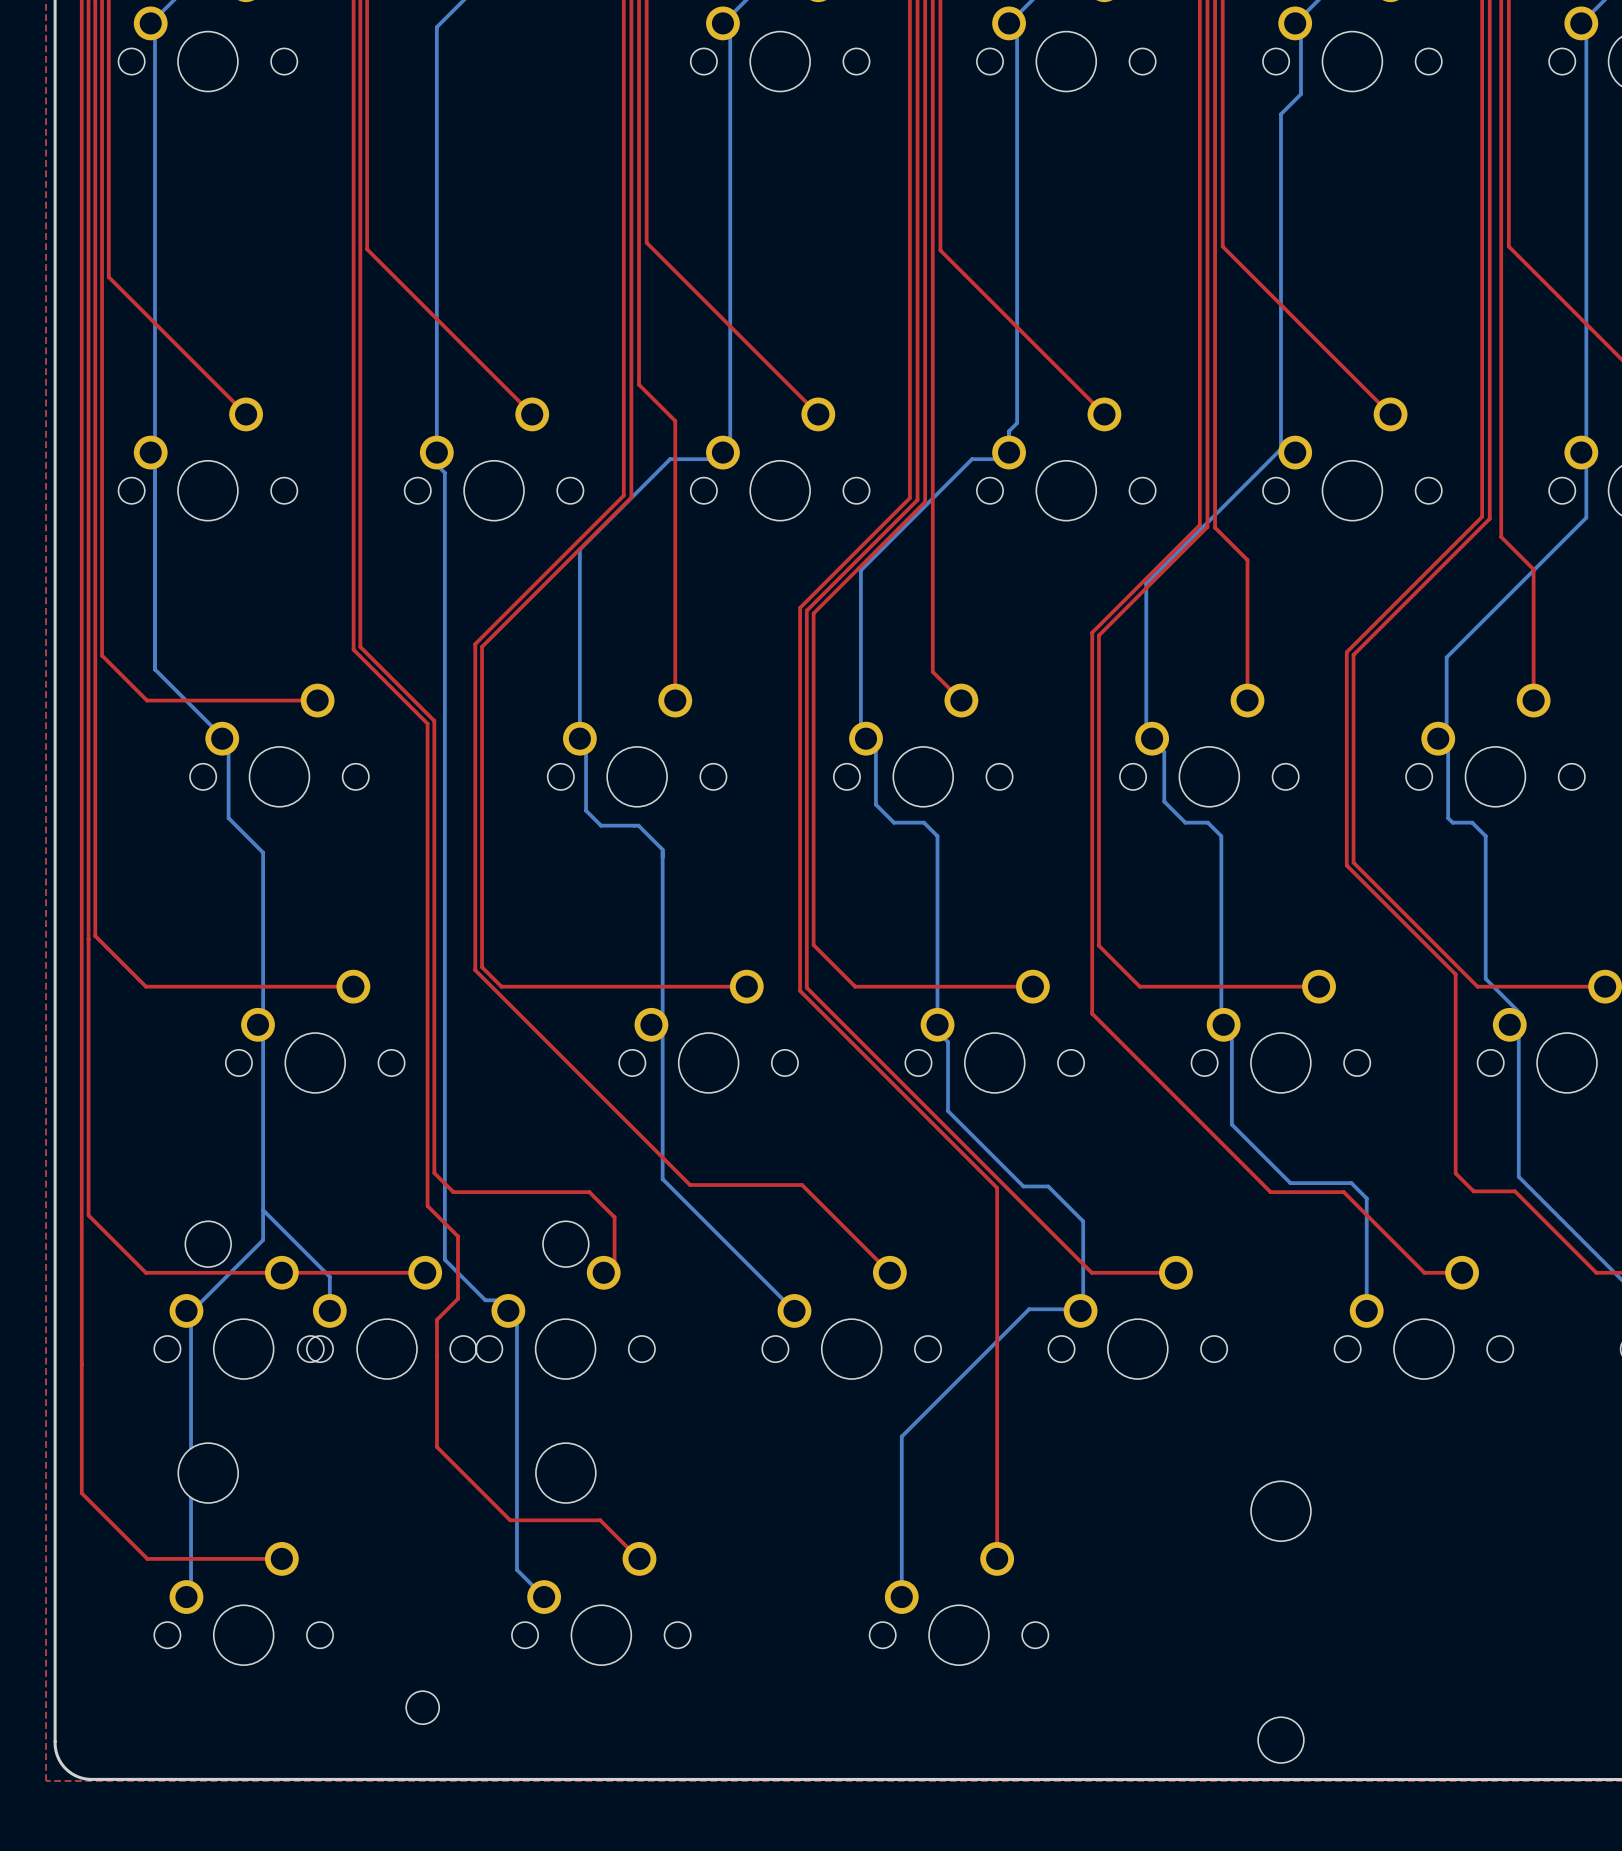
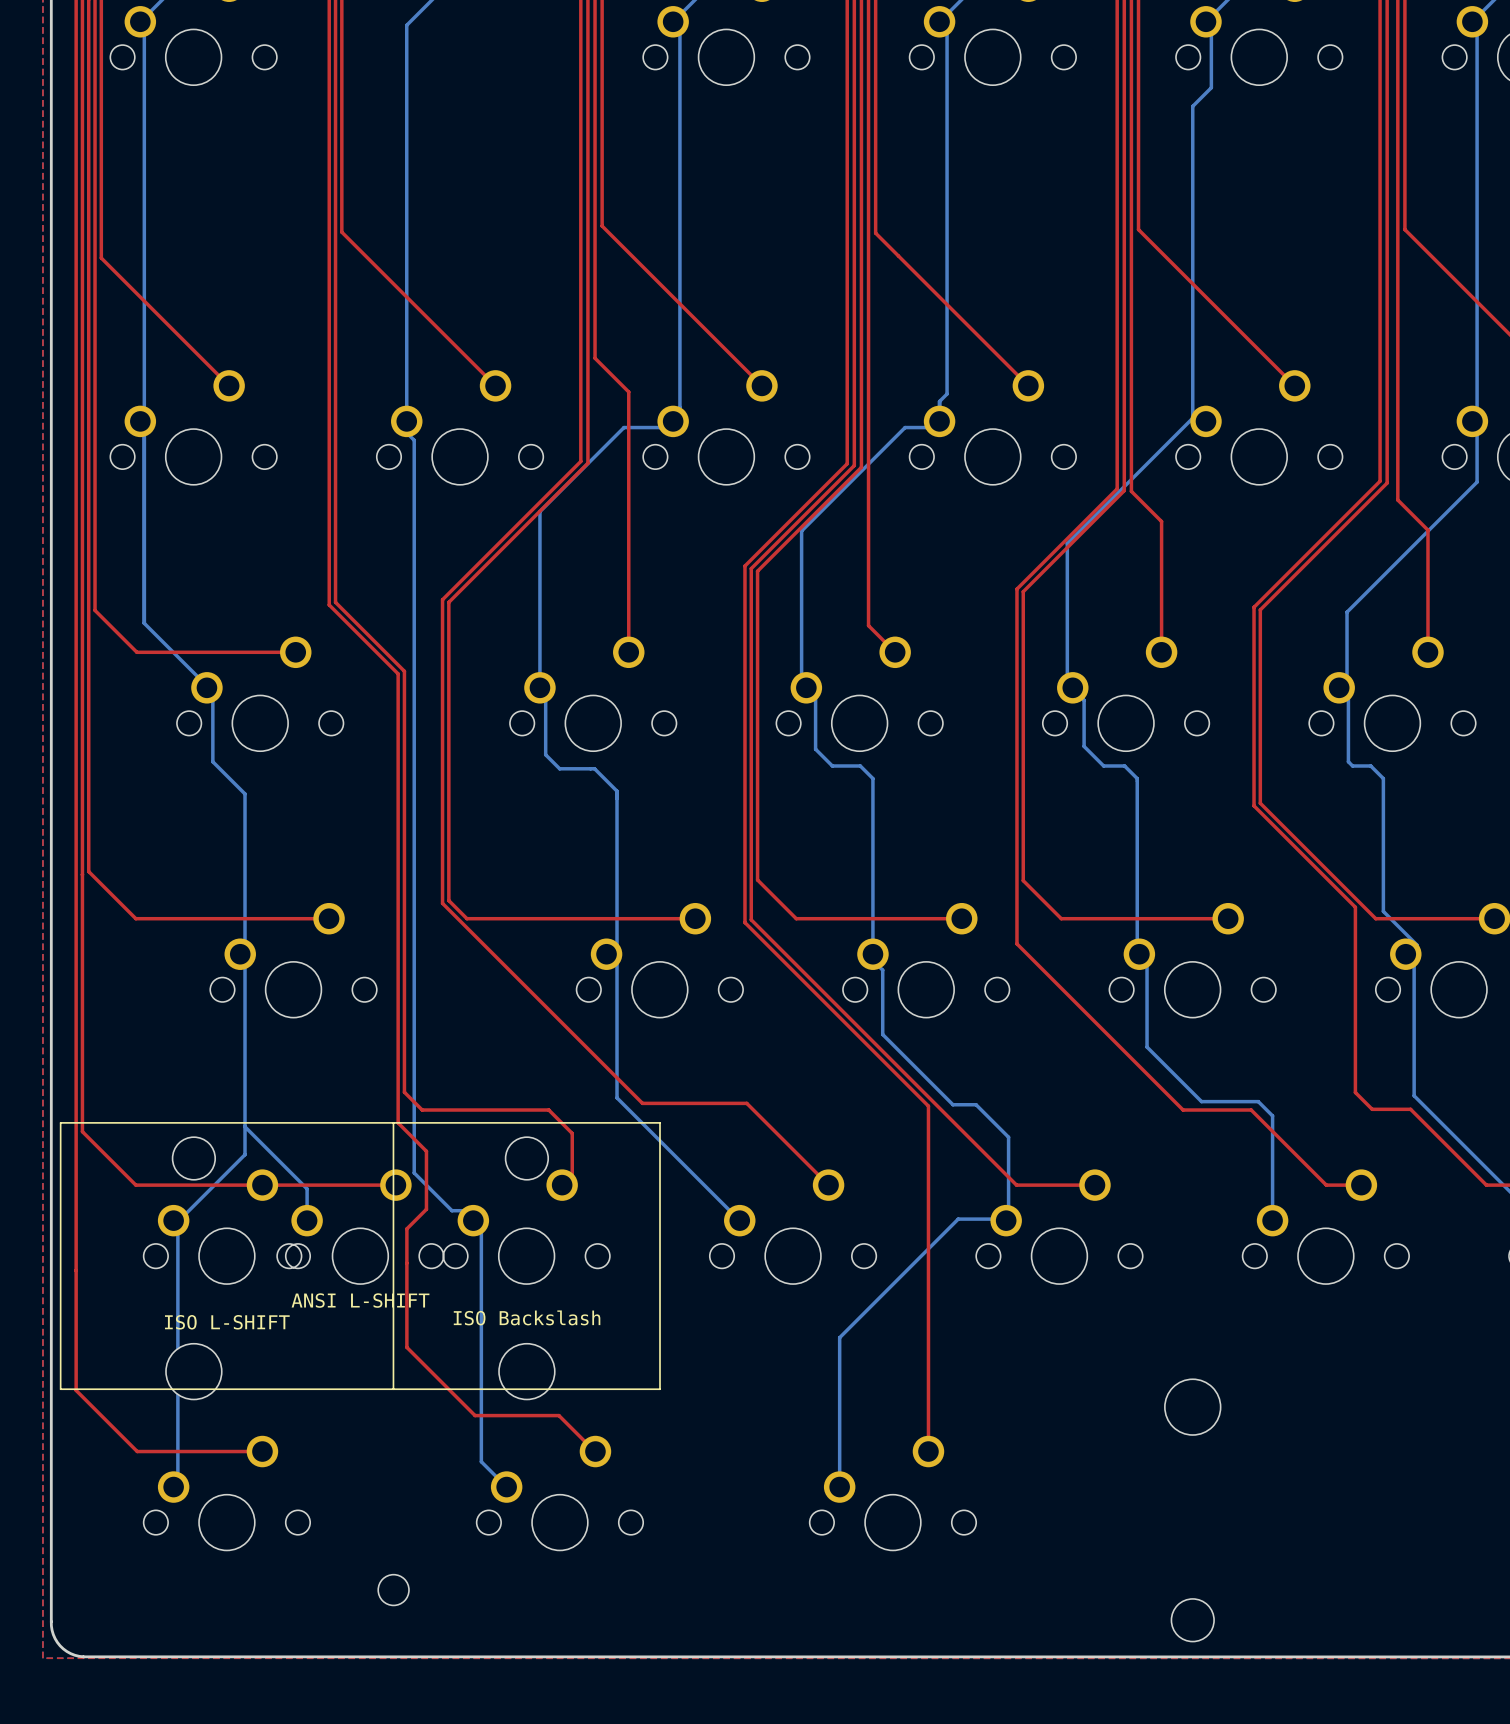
line: none -> (60, 1122) (60, 1389) (660, 1389) (660, 1122) (60, 1122)
line: none -> (393, 1122) (393, 1389)
text: none -> ANSI L-SHIFT (360, 1300)
text: none -> ISO Backslash (527, 1317)
text: none -> ISO L-SHIFT (227, 1322)

